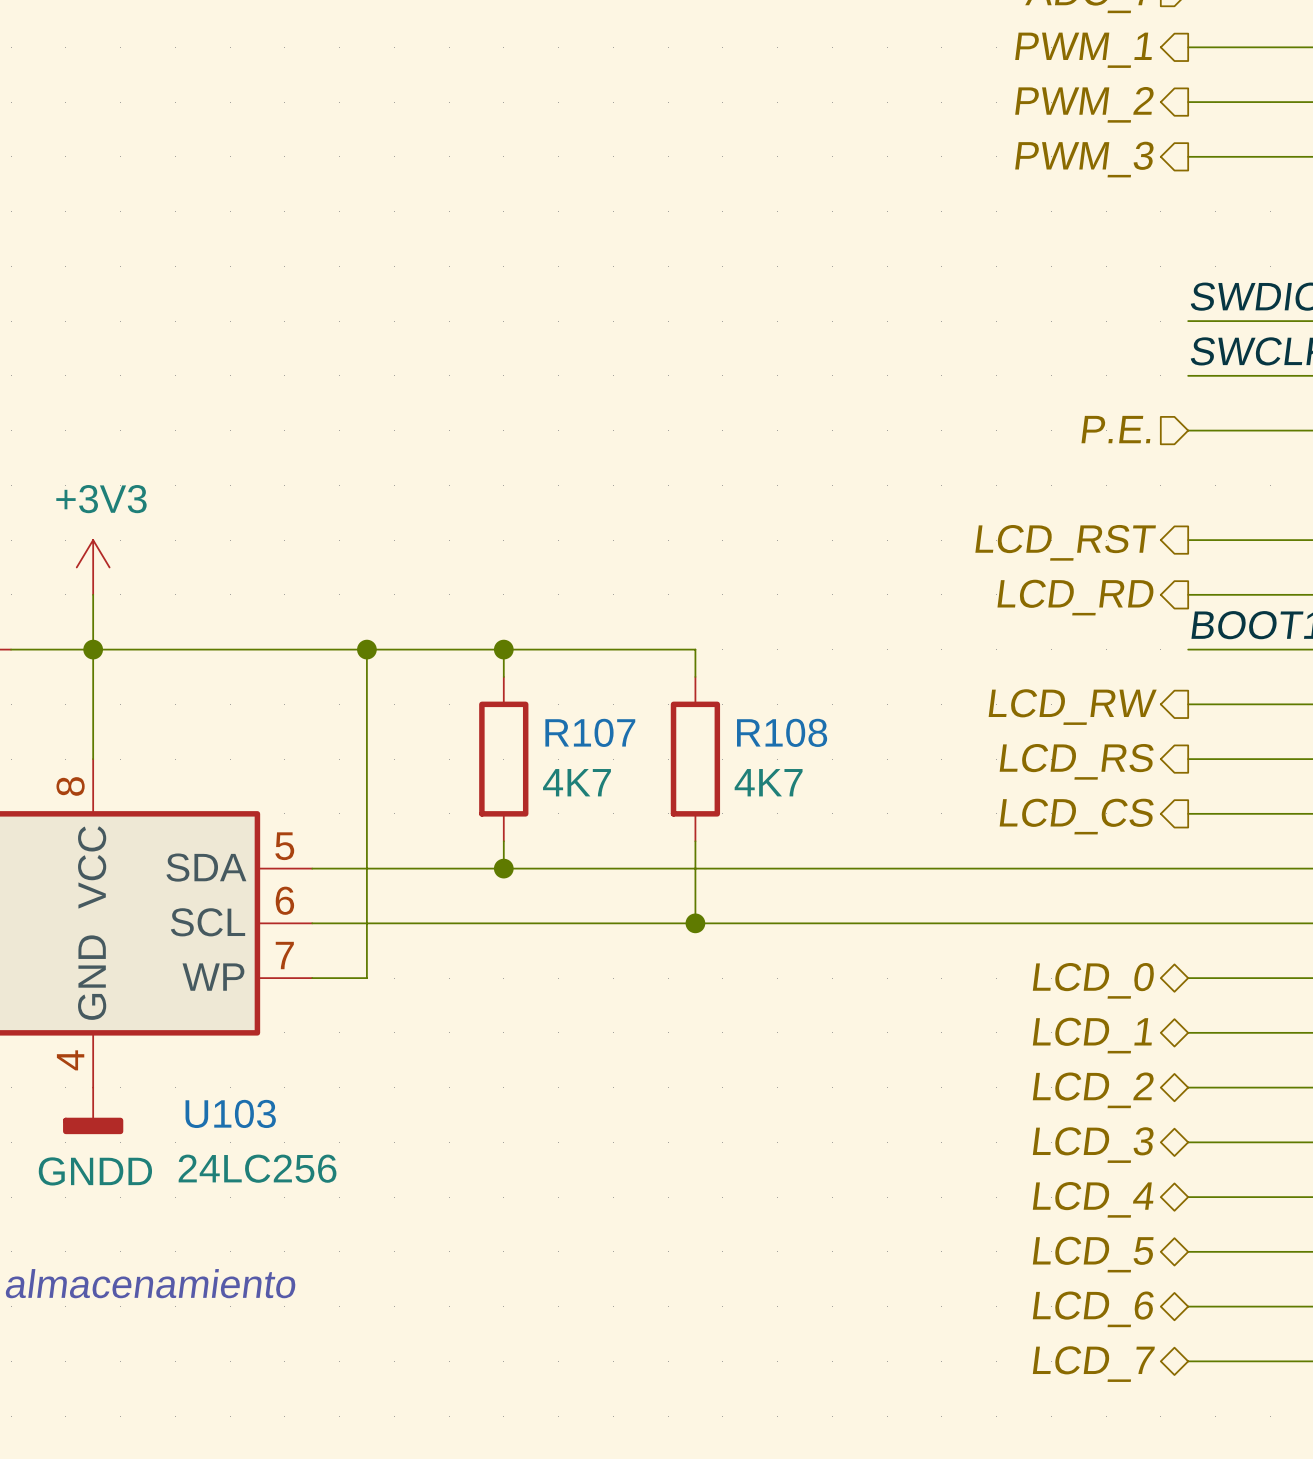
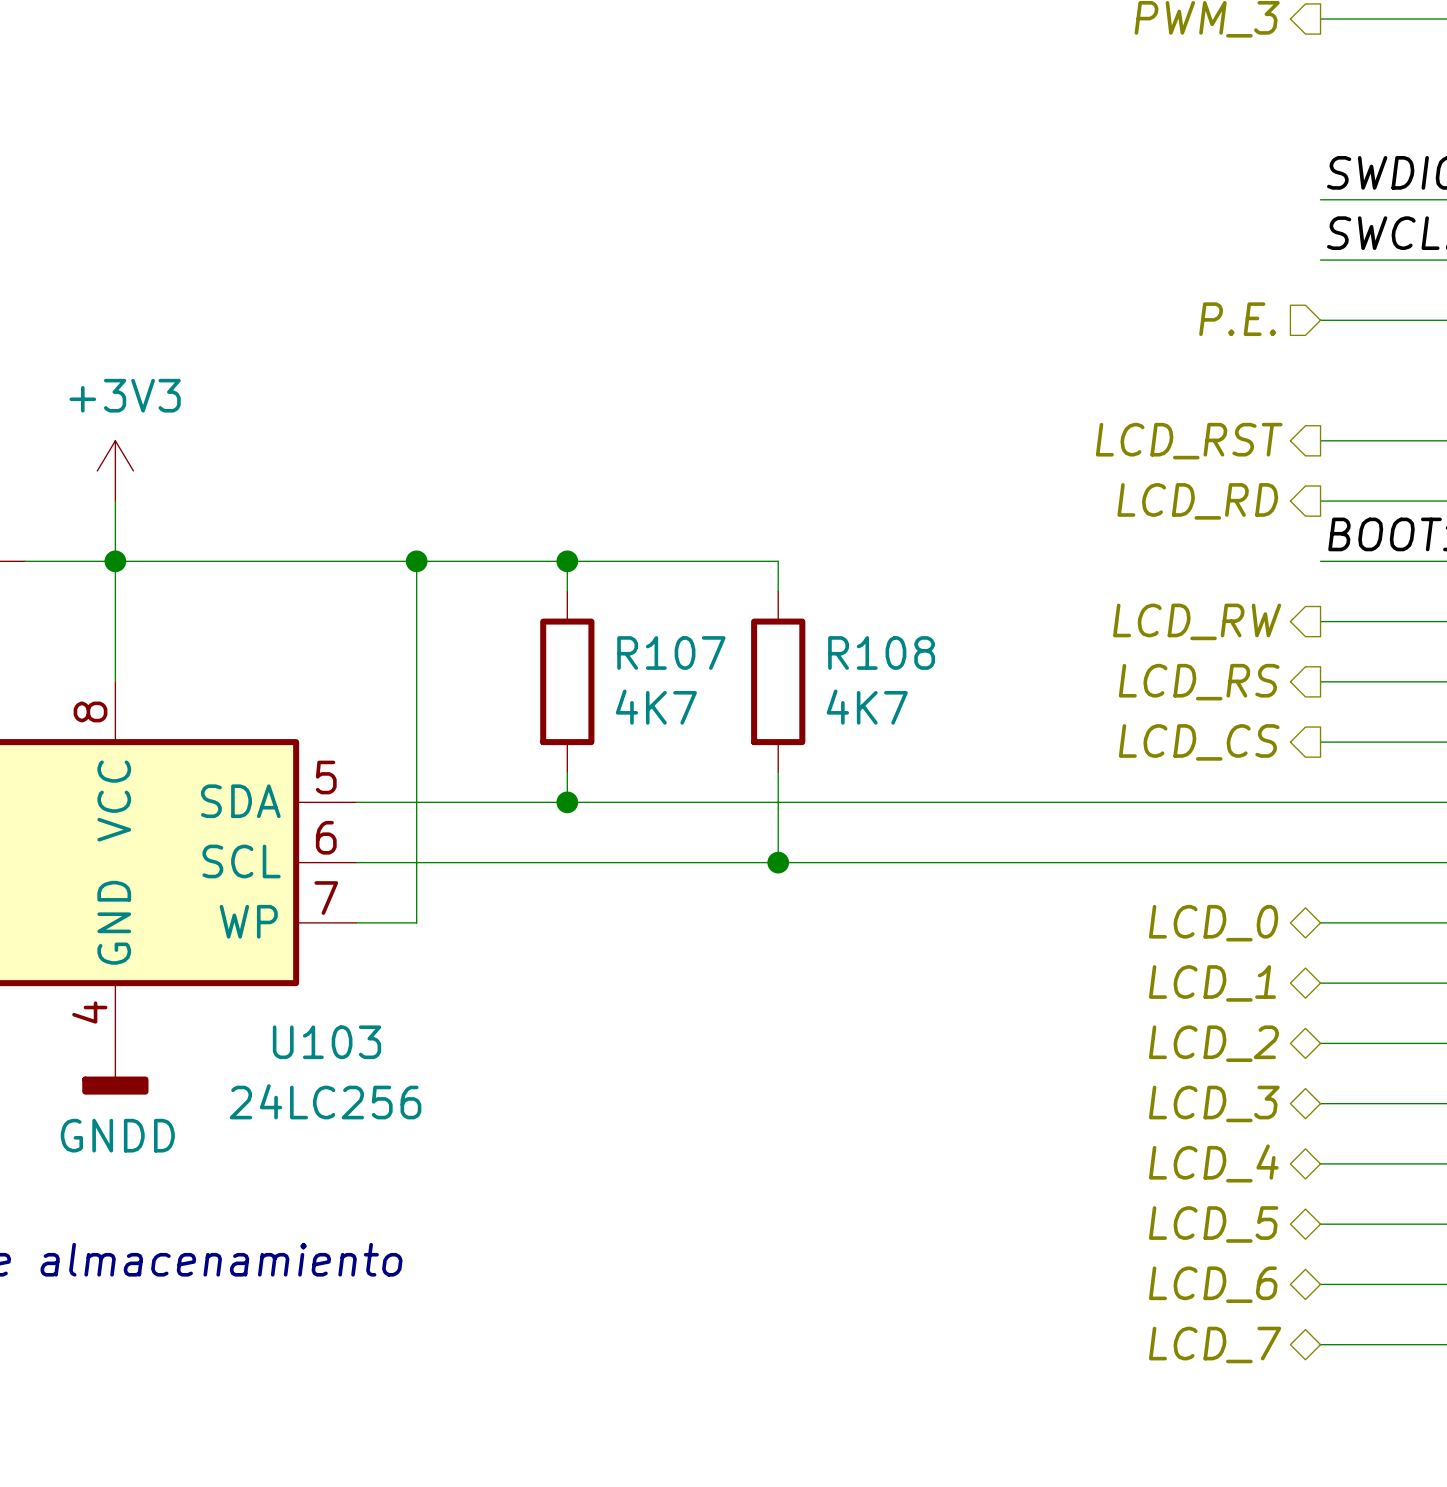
U103 name position: U103 (230, 1113) -> U103 (327, 1042)
U103 value position: 24LC256 (257, 1168) -> 24LC256 (325, 1101)

